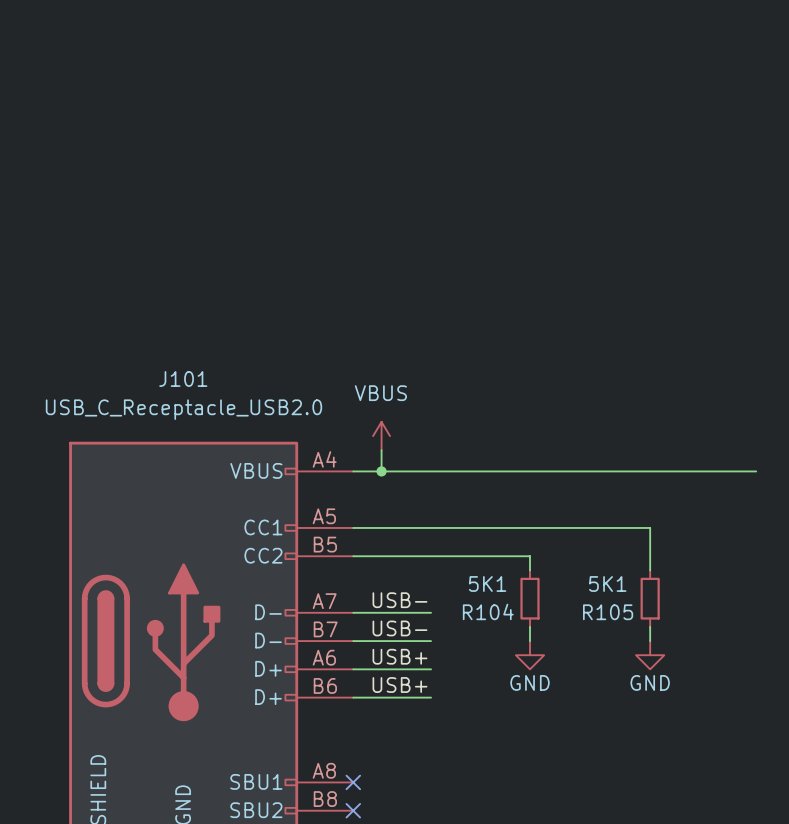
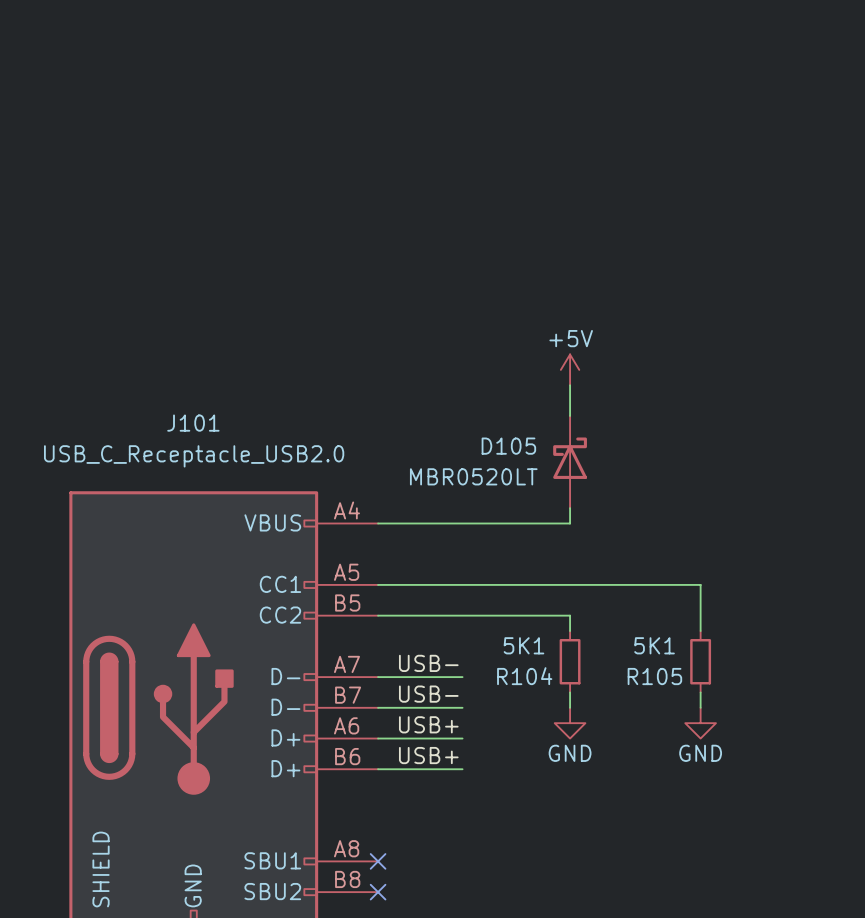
power symbol: none -> +5V (570, 369)
wire: none -> (570, 385) (570, 415)
D105: none -> MBR0520LT (570, 462)
power symbol: VBUS (381, 436) -> none
wire: (381, 450) (381, 471) -> none
junction: (381, 471) -> none
wire: (530, 471) (756, 471) -> (570, 523) (570, 508)

